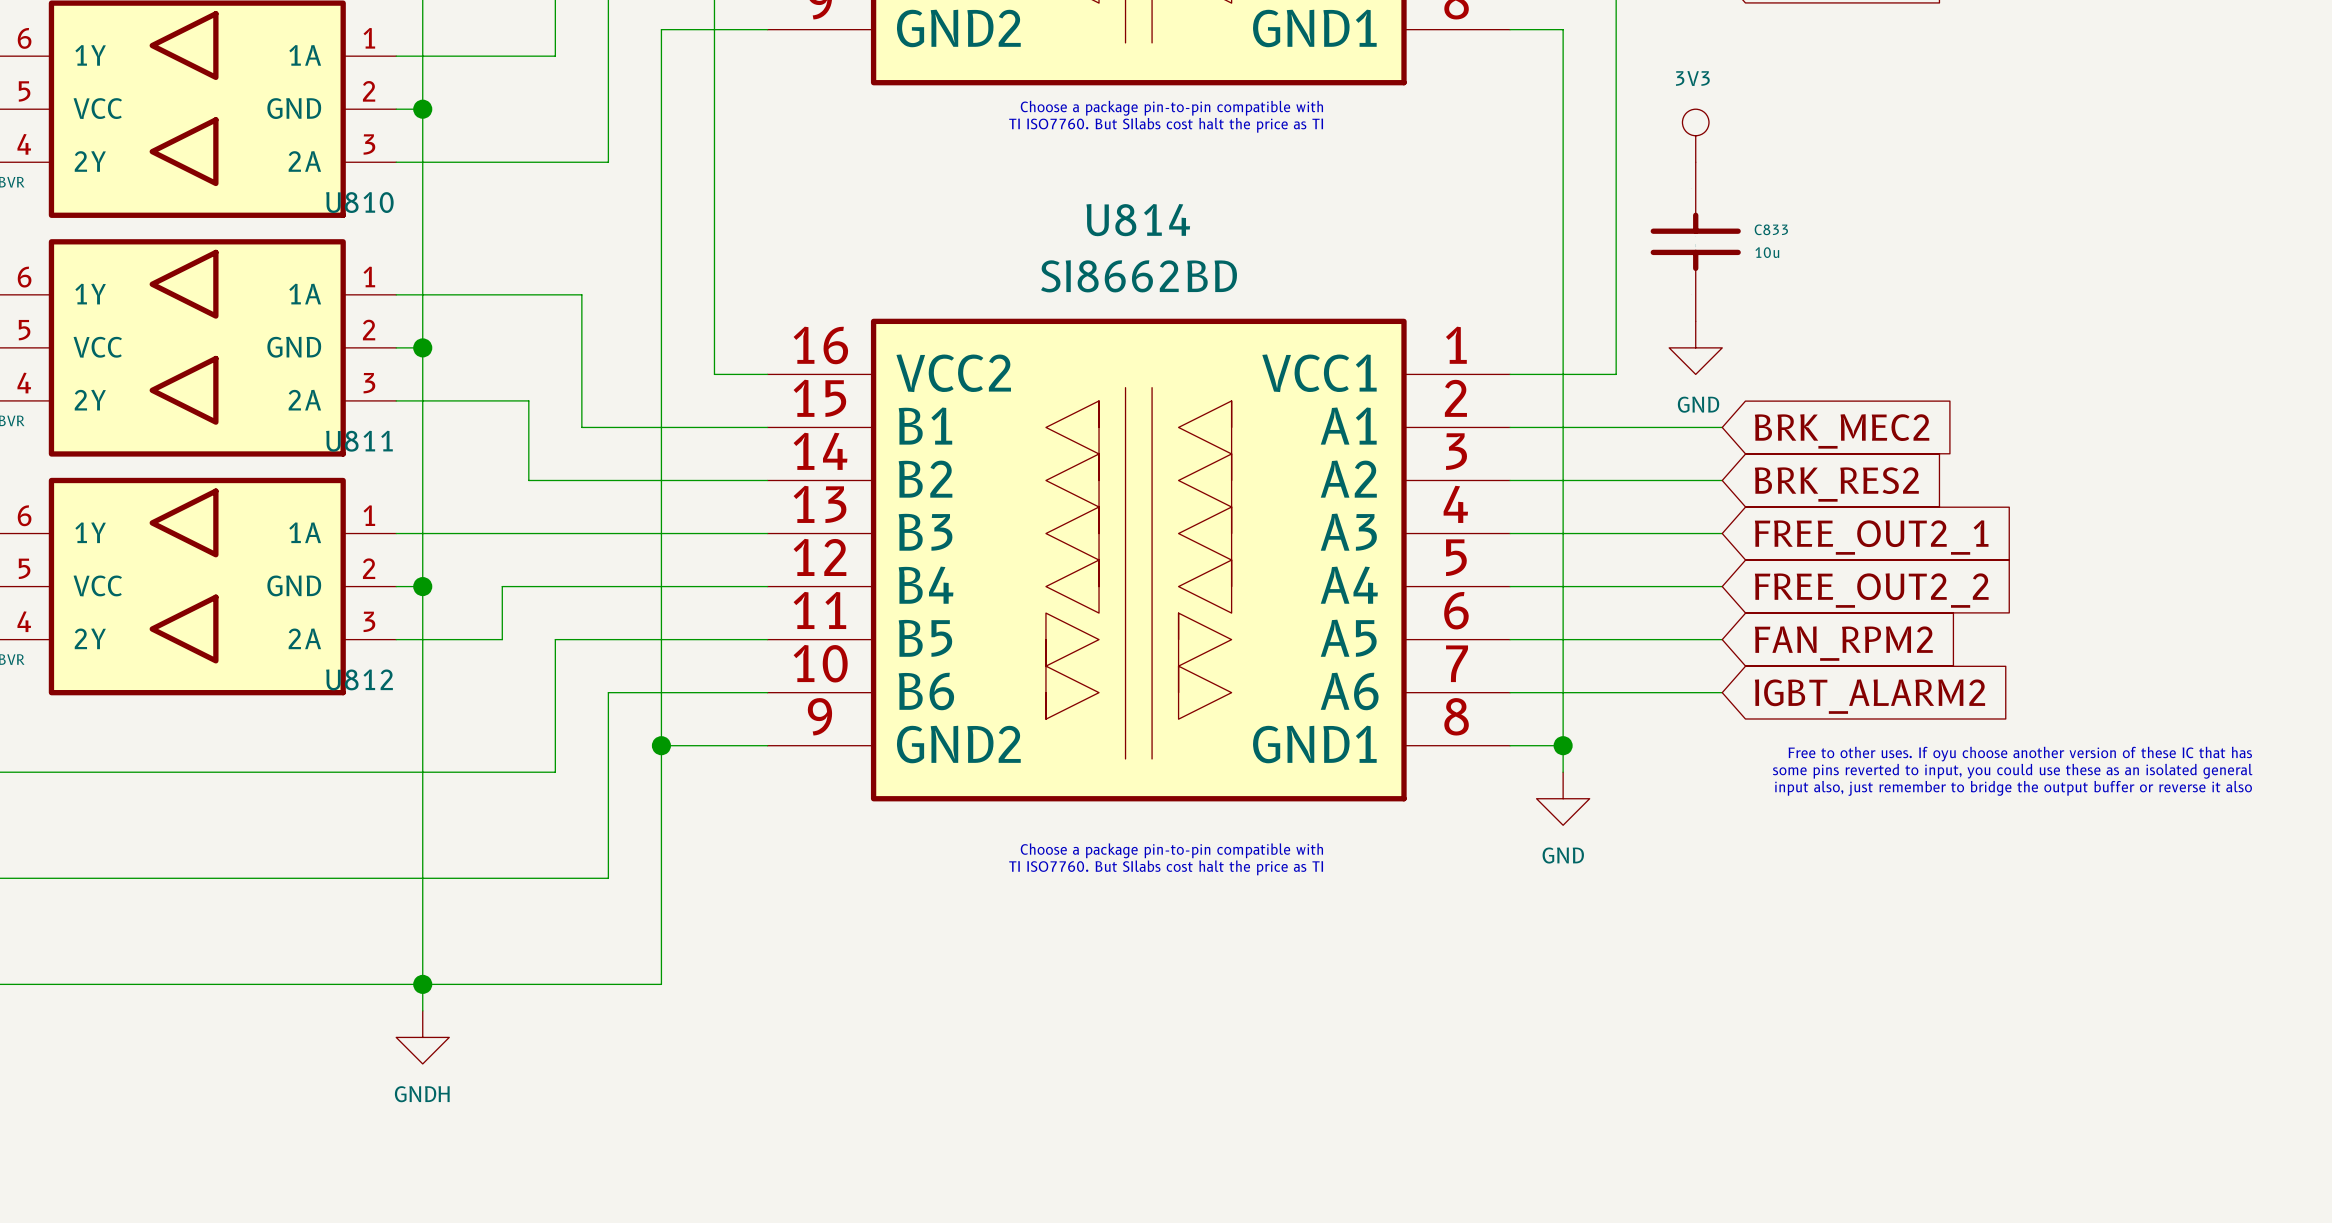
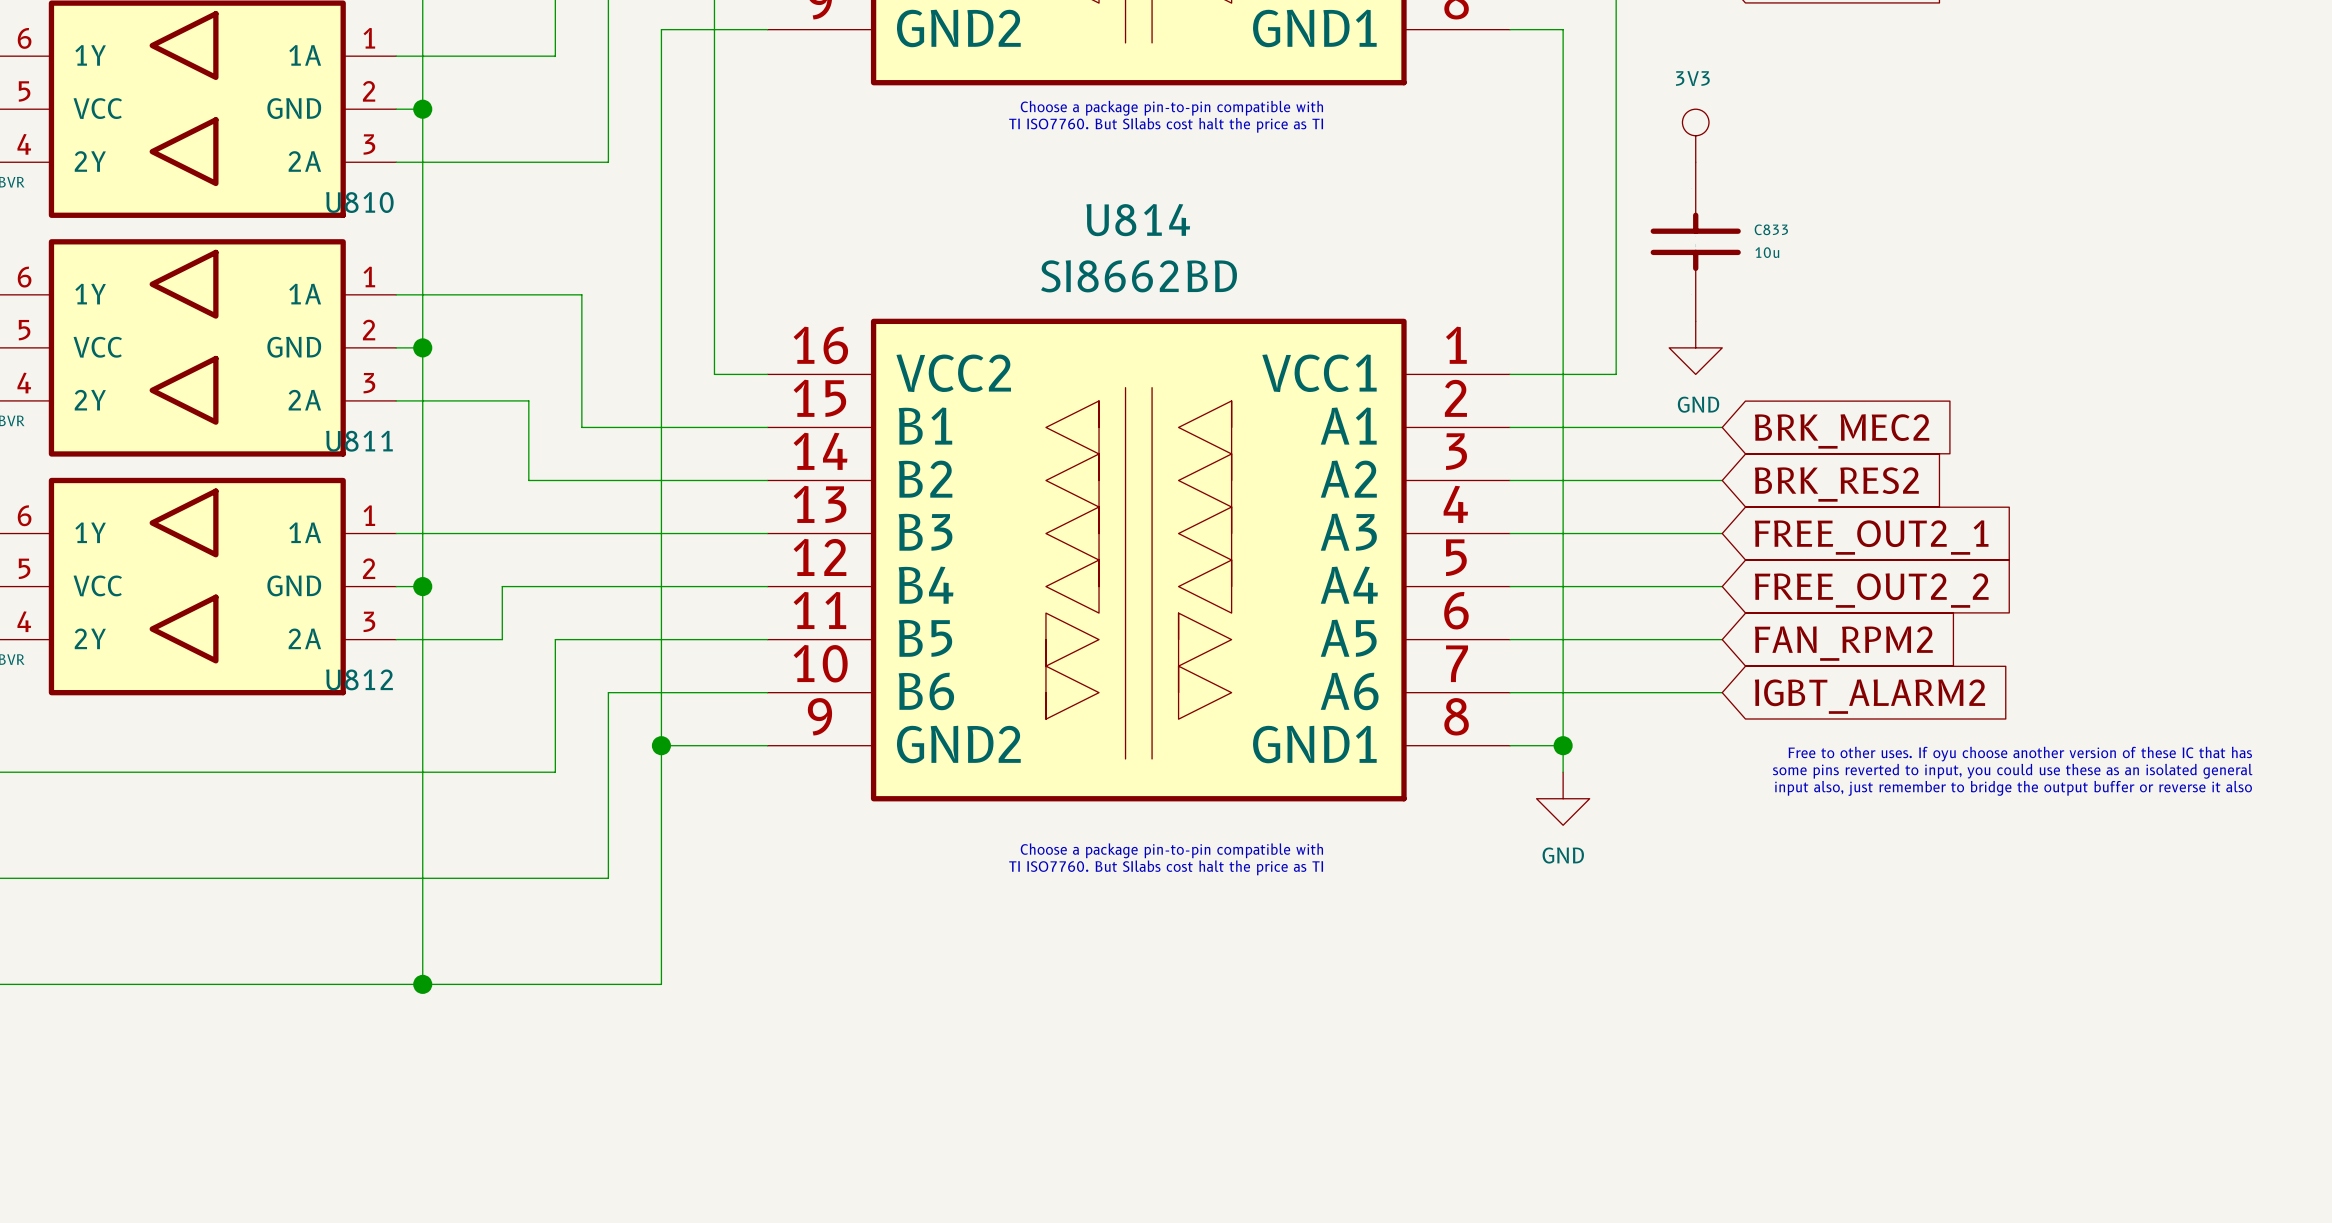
wire: (422, 984) (422, 1010) -> none
power symbol: GNDH (422, 1037) -> none

